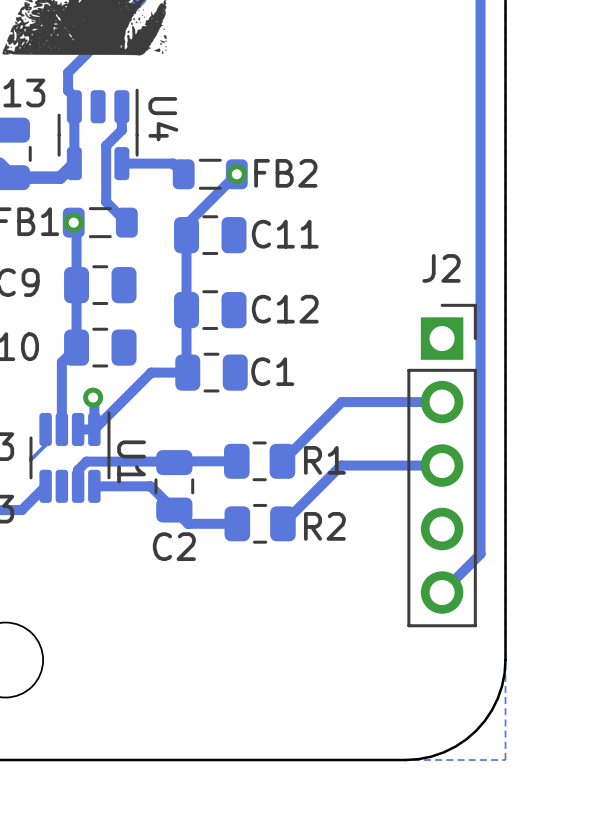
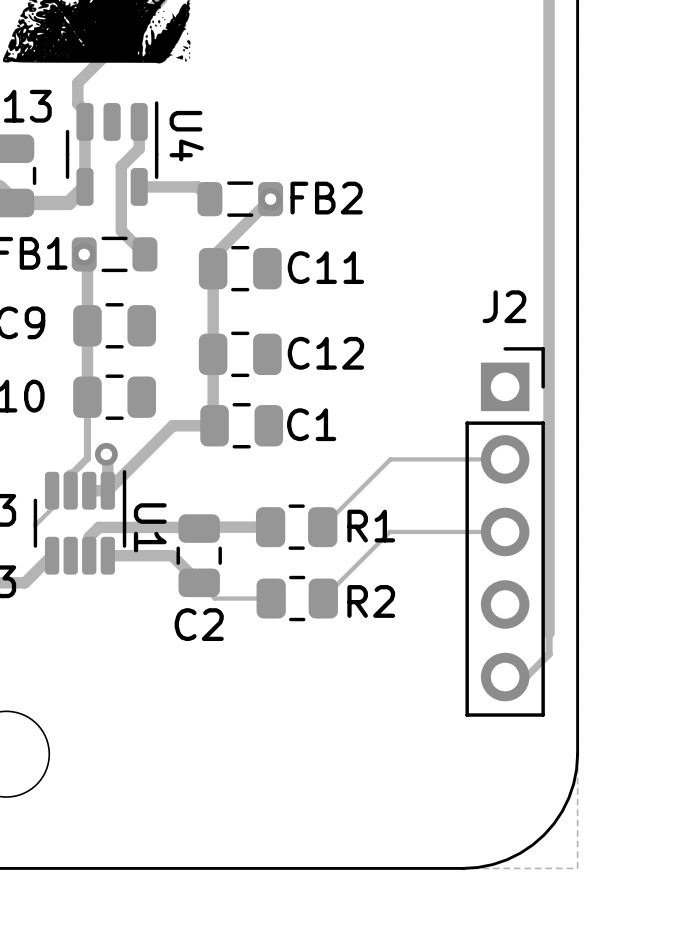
track: (76, 347) (61, 362) (61, 415) -> (87, 397) (87, 458) (70, 475)
track width: thick (442, 402) (341, 402) (282, 461) -> thin (505, 459) (390, 459) (322, 527)
track width: thick (442, 465) (341, 465) (282, 523) -> thin (505, 531) (389, 531) (323, 598)
track width: thick (174, 510) (188, 523) (237, 523) -> thin (199, 582) (214, 598) (271, 598)
track: (480, 554) (442, 592) -> (549, 633) (549, 654) (526, 677) (505, 677)

